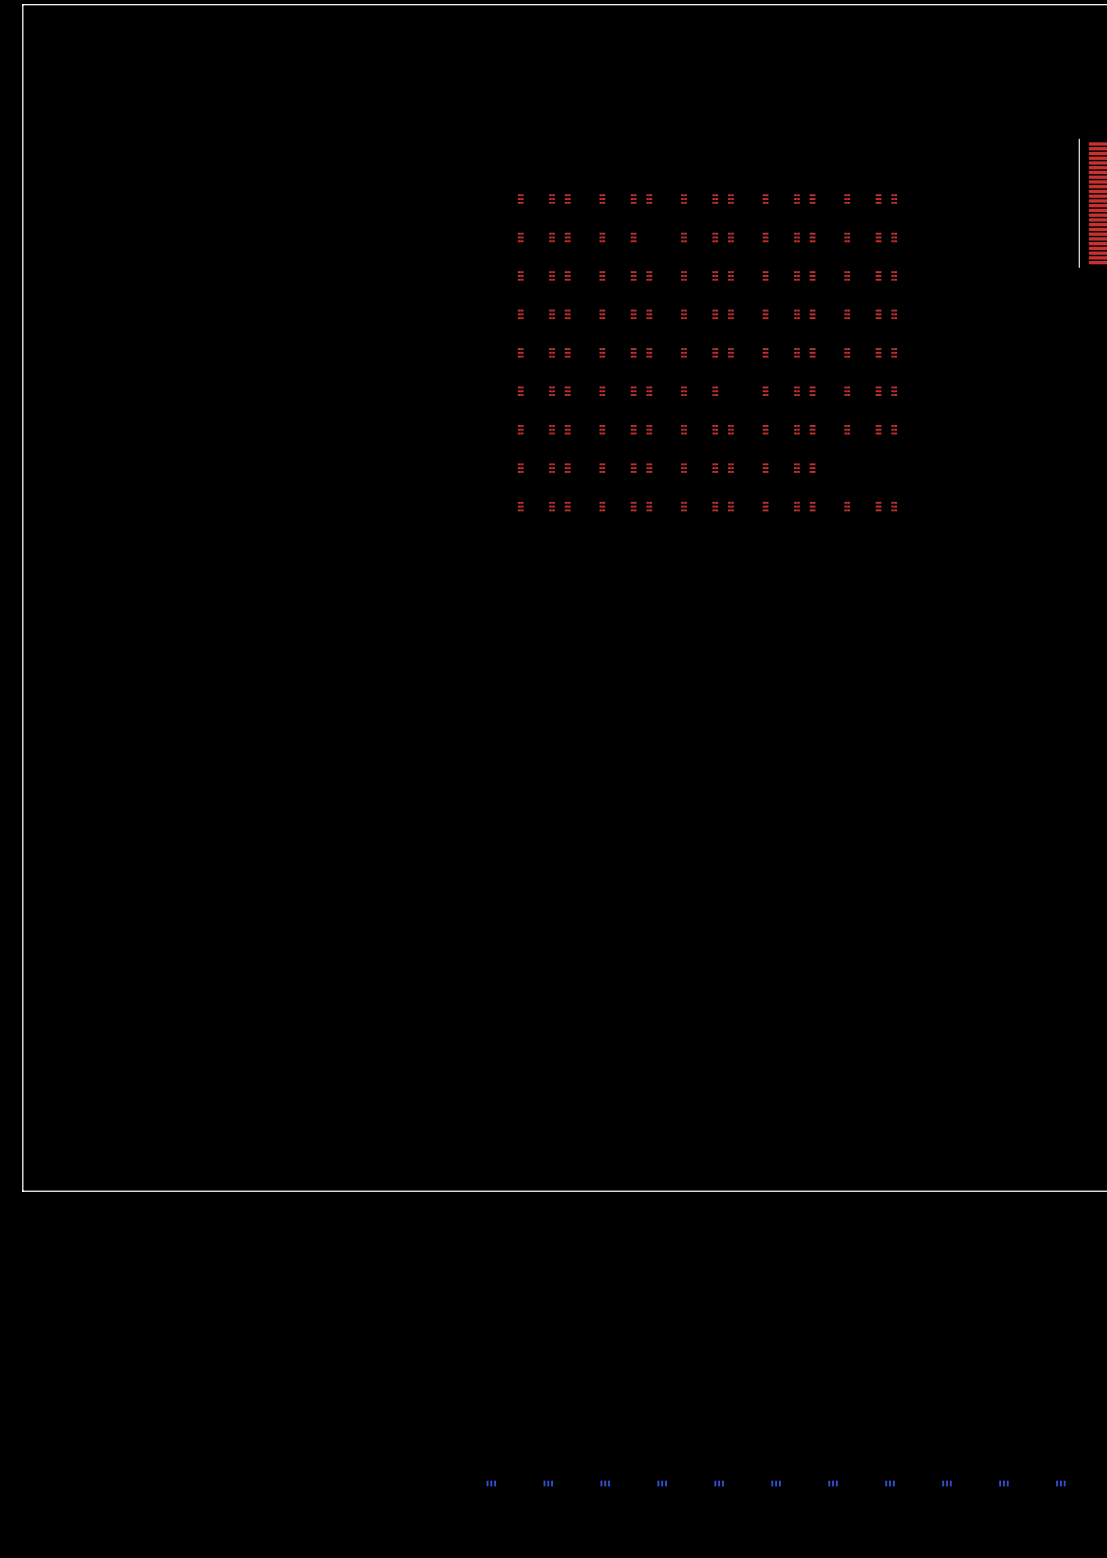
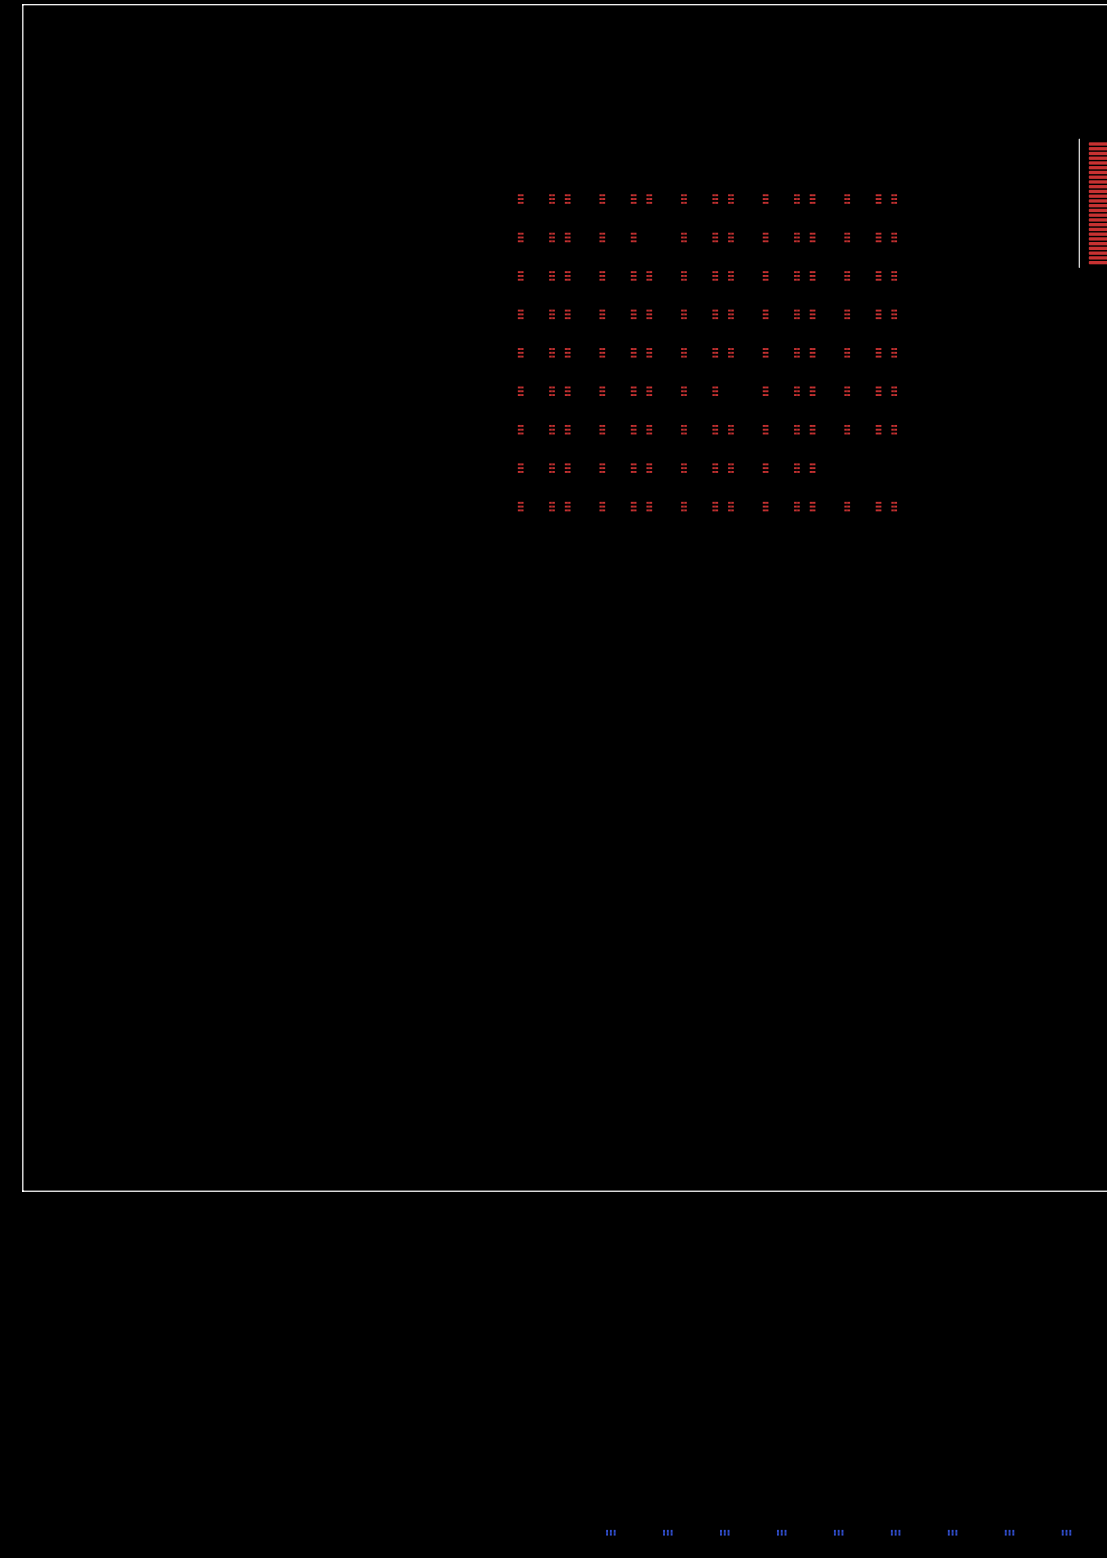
part: (491, 1483) -> none
part: (548, 1483) -> none
part: (605, 1483) -> none
part: (662, 1483) -> none
part: (719, 1483) -> none
part: (776, 1483) -> none
part: (833, 1483) -> none
part: (890, 1483) -> none
part: (946, 1483) -> none
part: (1003, 1483) -> none
part: (1060, 1483) -> none
part: none -> (610, 1532)
part: none -> (667, 1532)
part: none -> (724, 1532)
part: none -> (781, 1532)
part: none -> (838, 1532)
part: none -> (895, 1532)
part: none -> (952, 1532)
part: none -> (1009, 1532)
part: none -> (1066, 1532)

